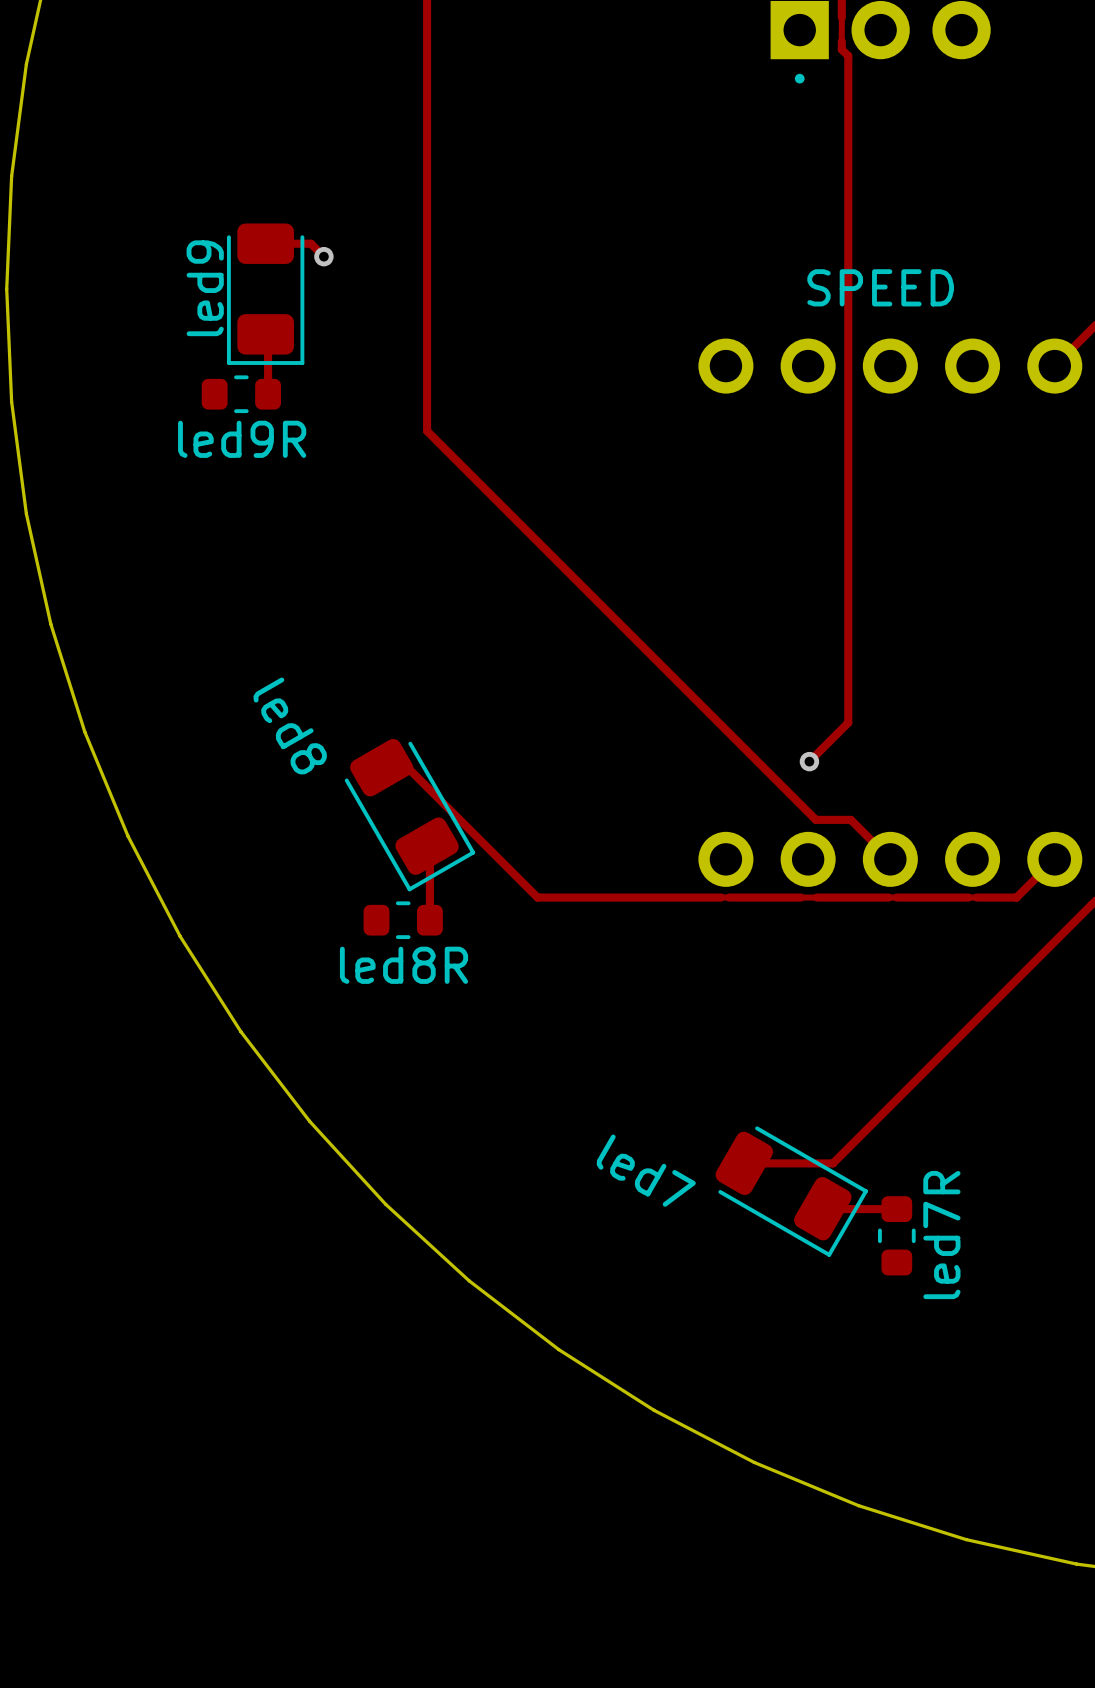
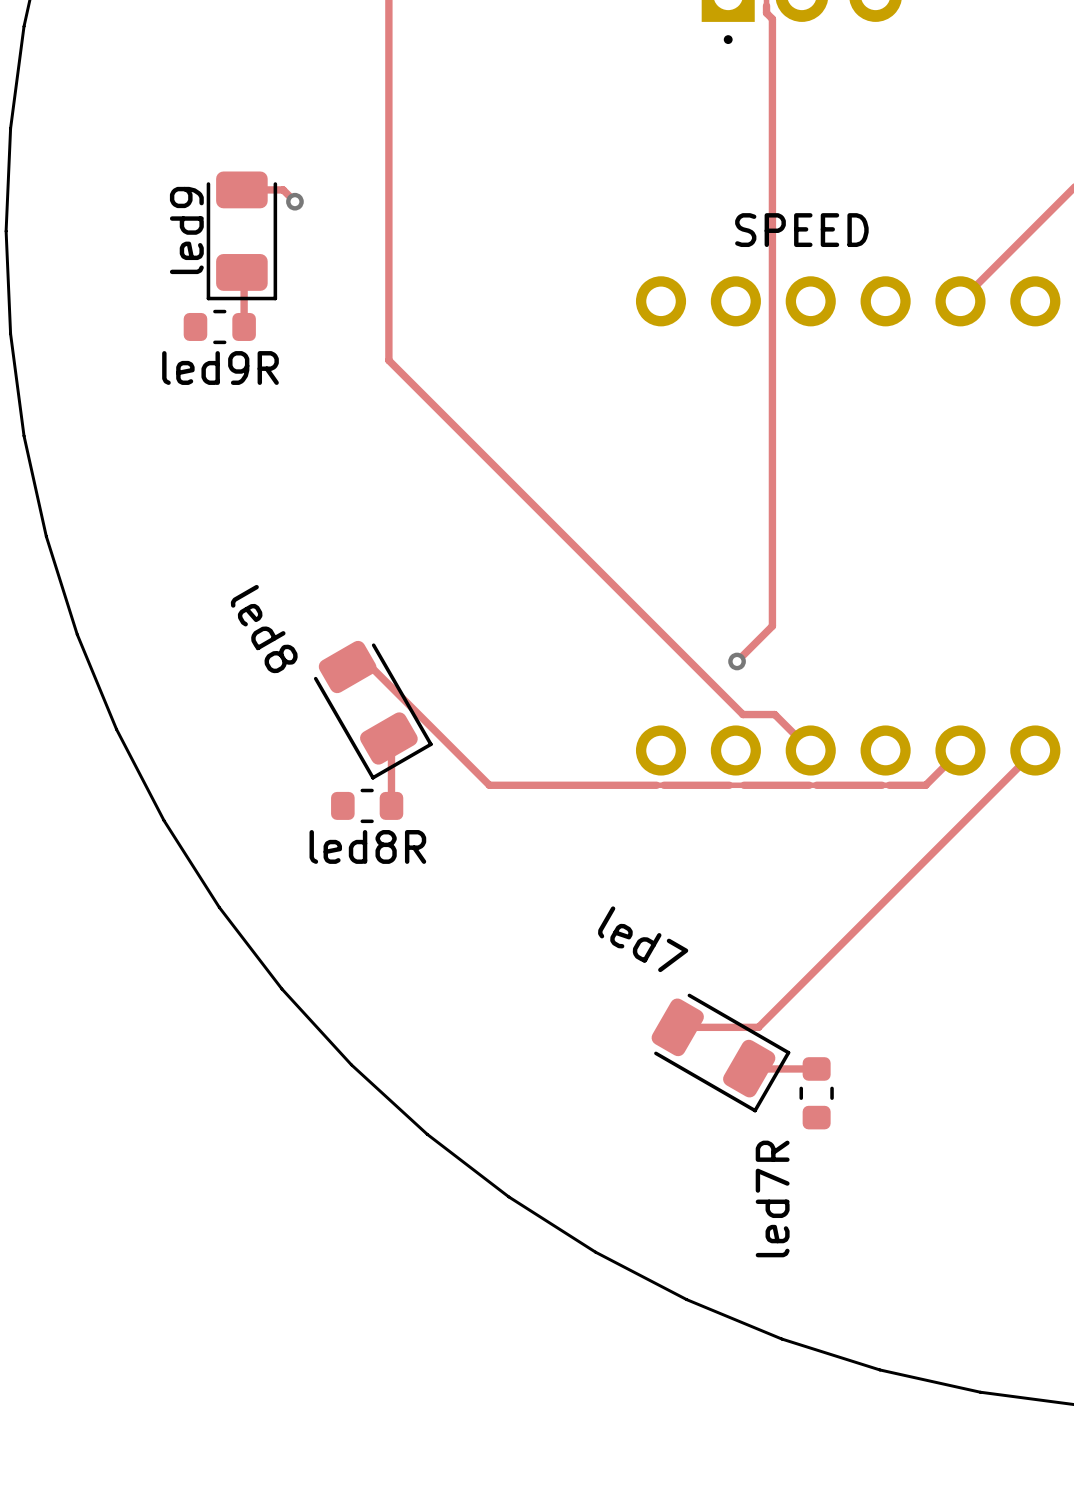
led7 name position: led7 (646, 1170) -> led7 (643, 939)
led7R name position: led7R (941, 1235) -> led7R (772, 1198)

